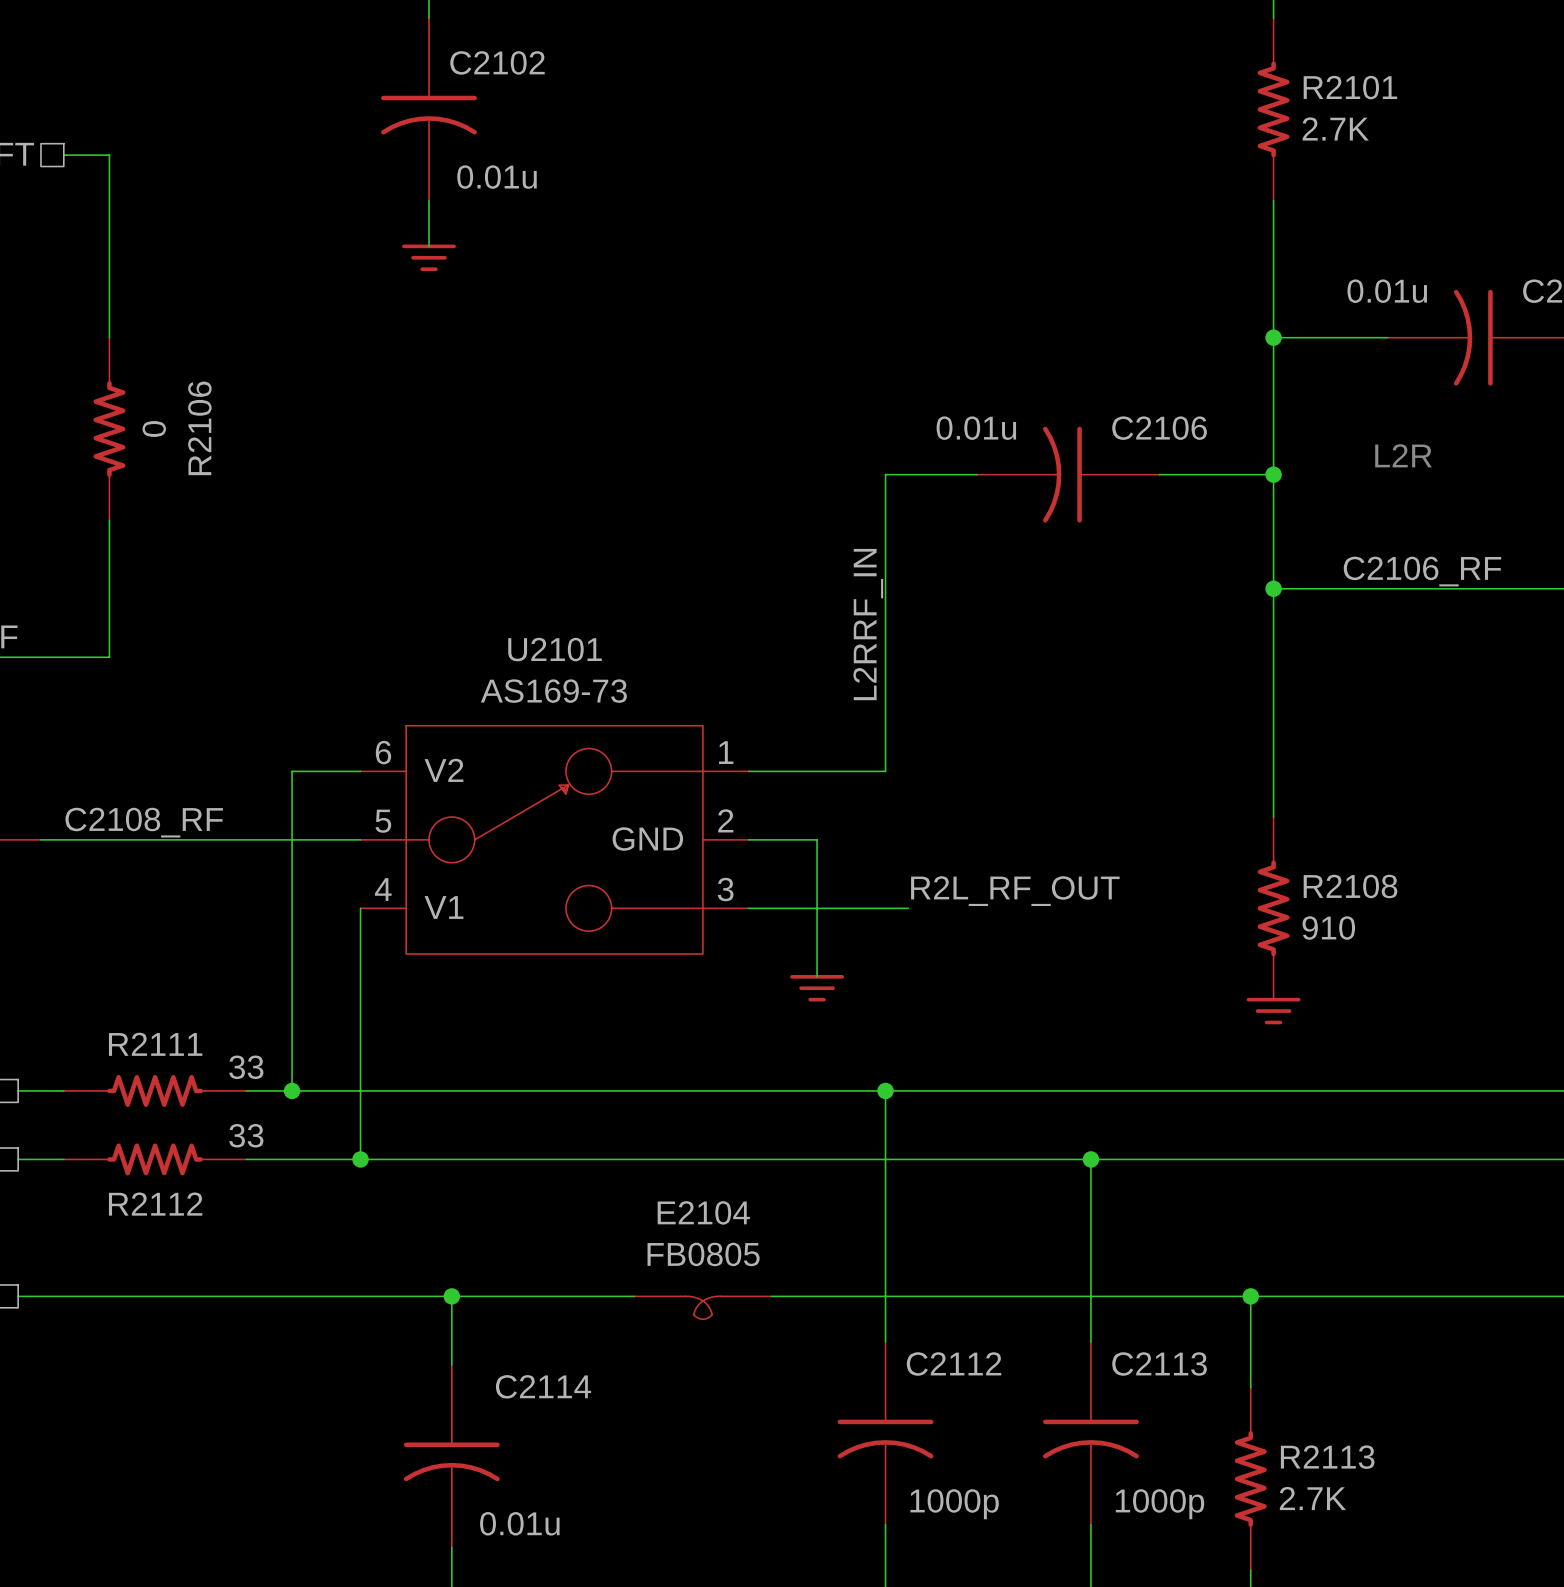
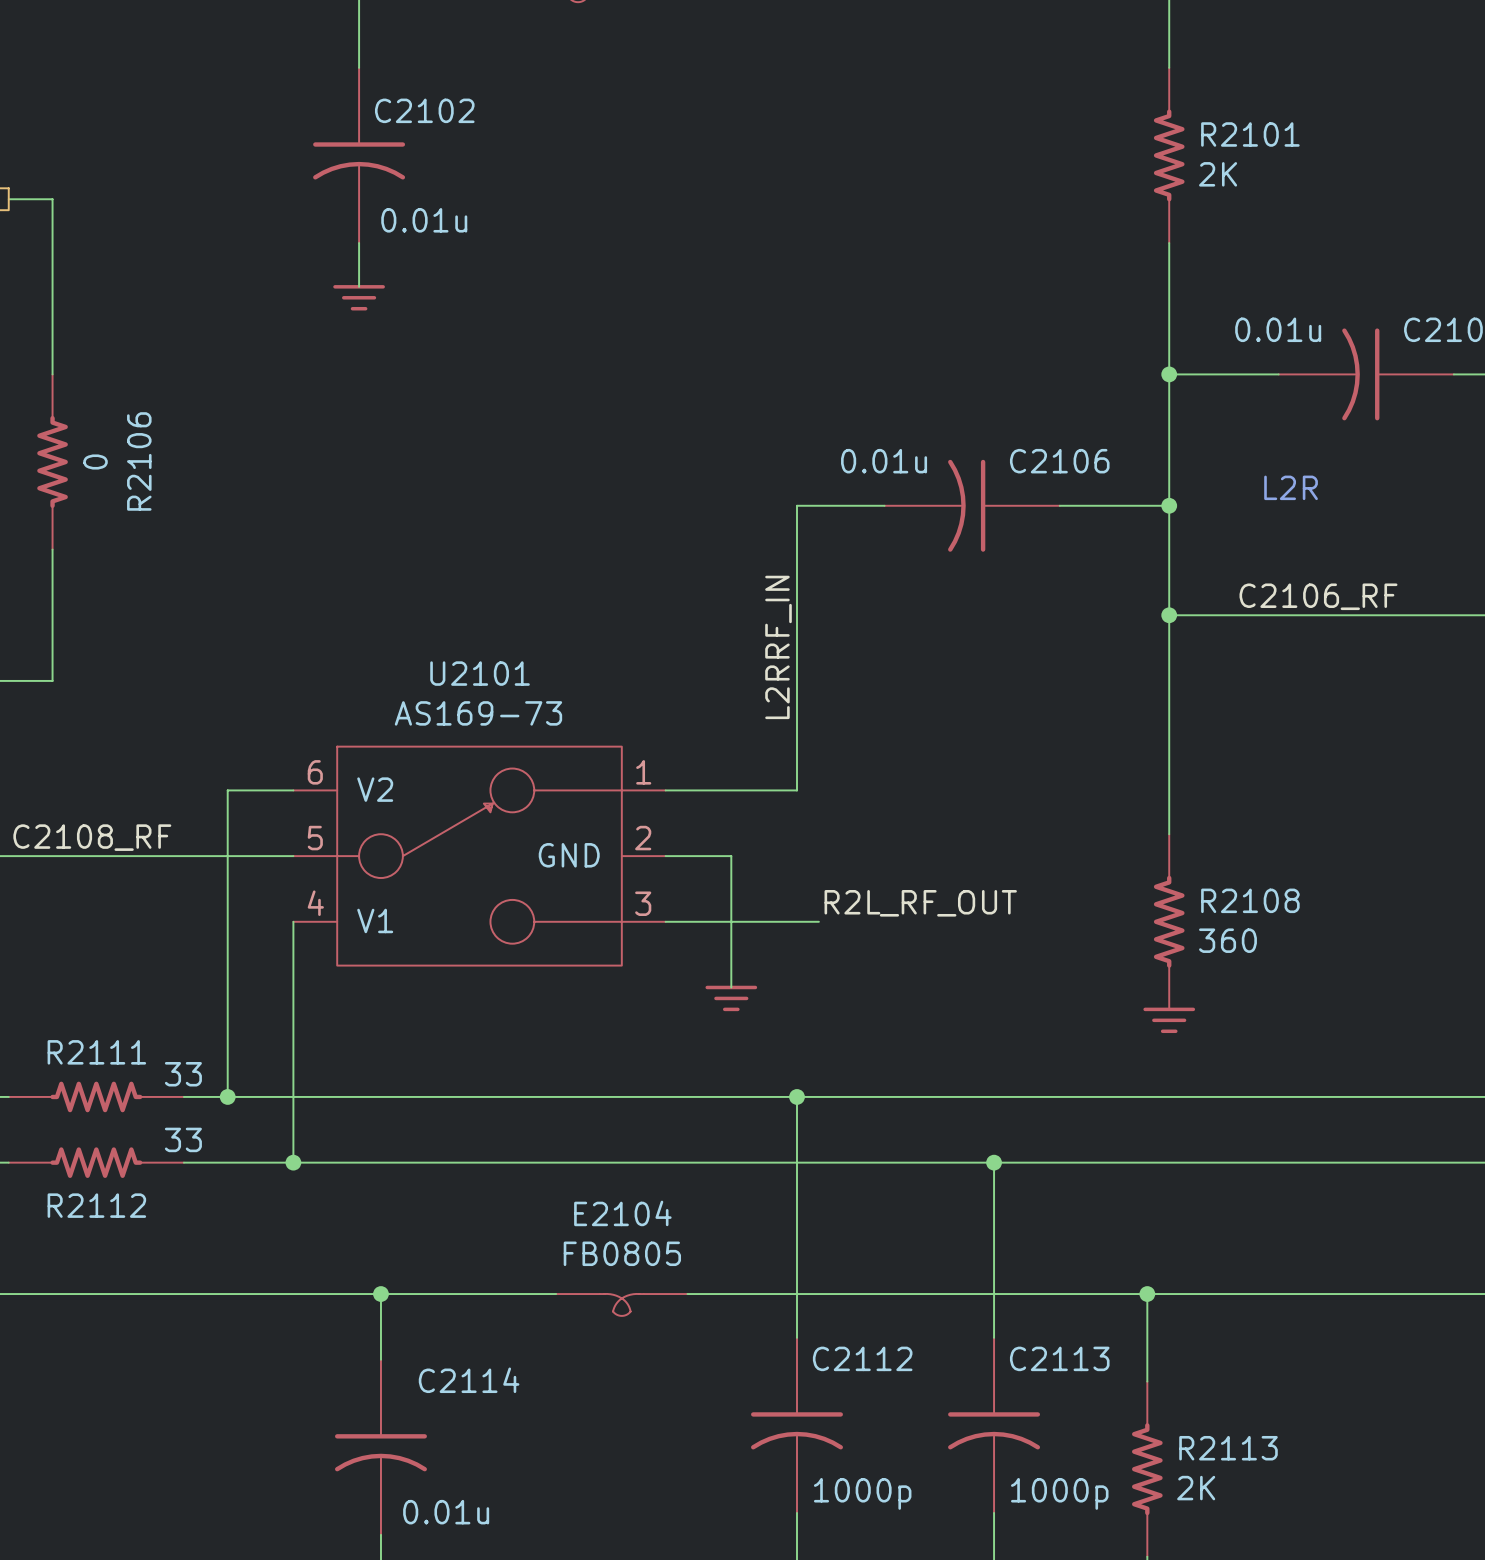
R2101 value: 2.7K (1335, 128) -> 2K (1218, 174)
R2108 value: 910 (1328, 928) -> 360 (1227, 940)
R2113 value: 2.7K (1312, 1498) -> 2K (1196, 1488)

